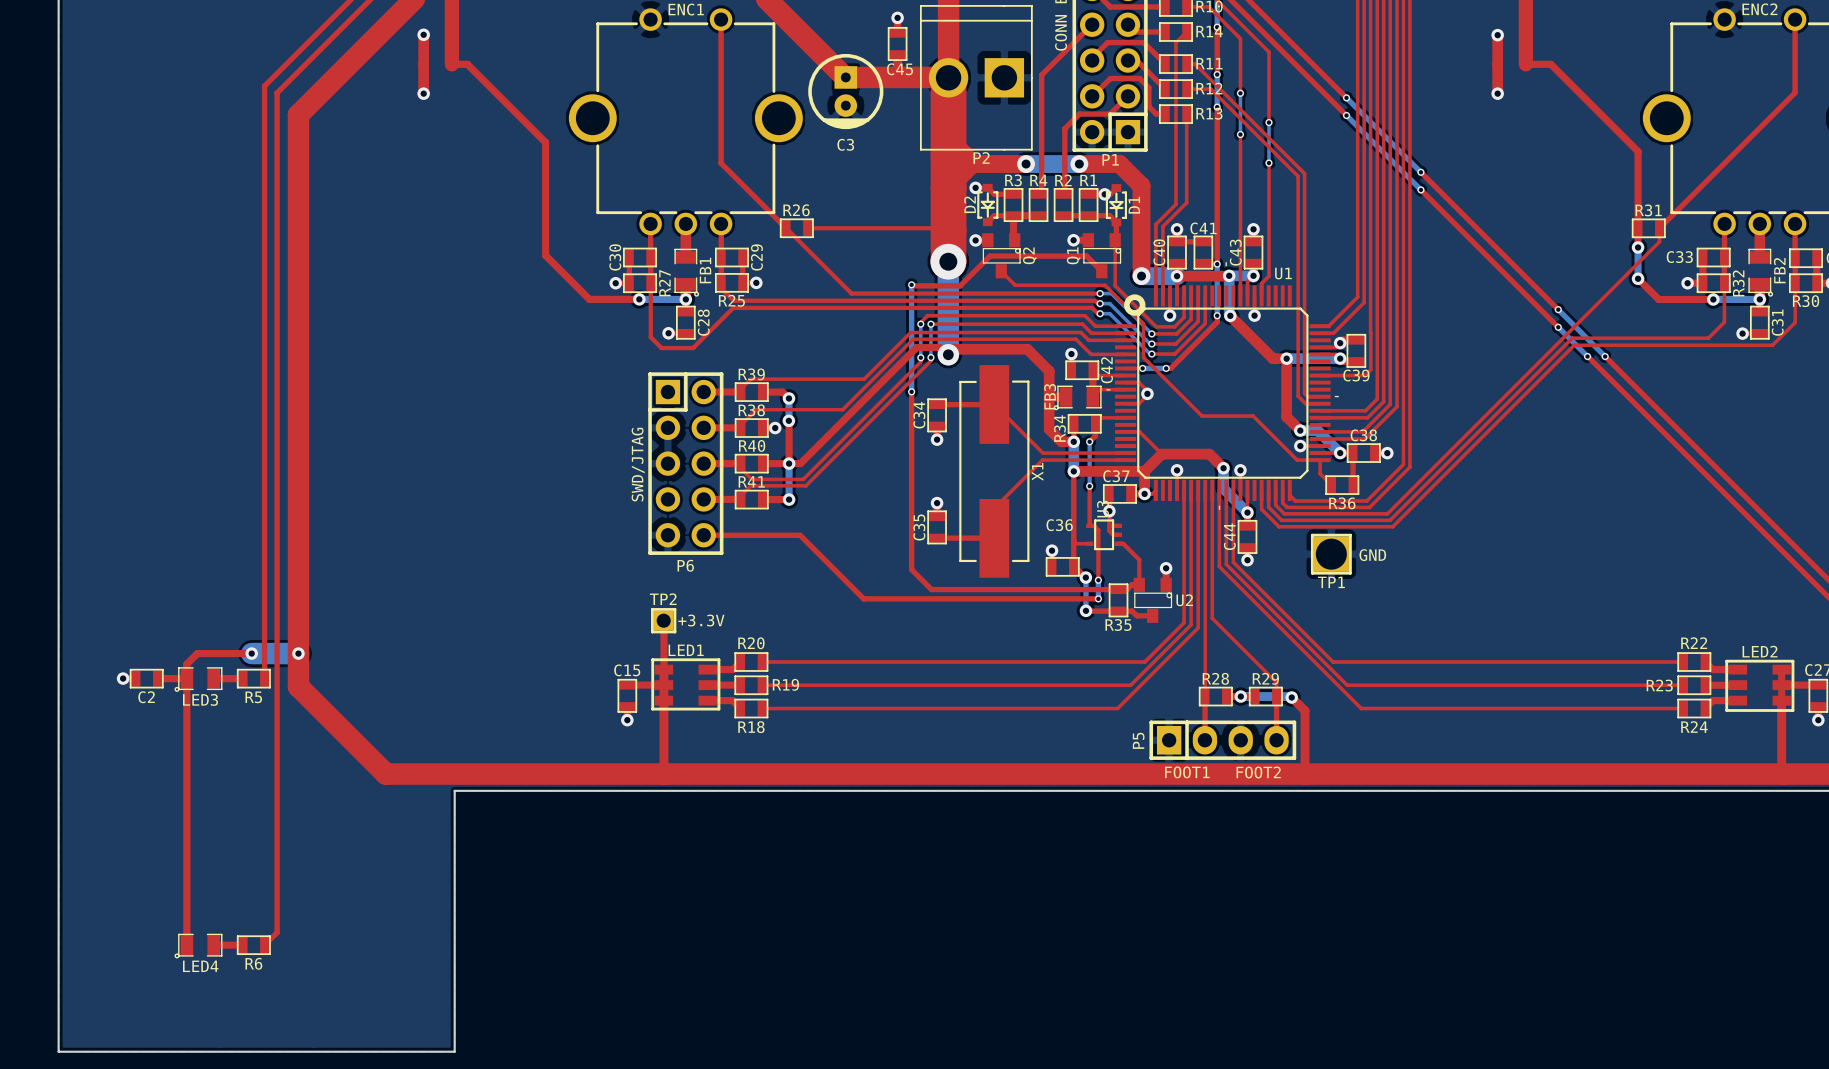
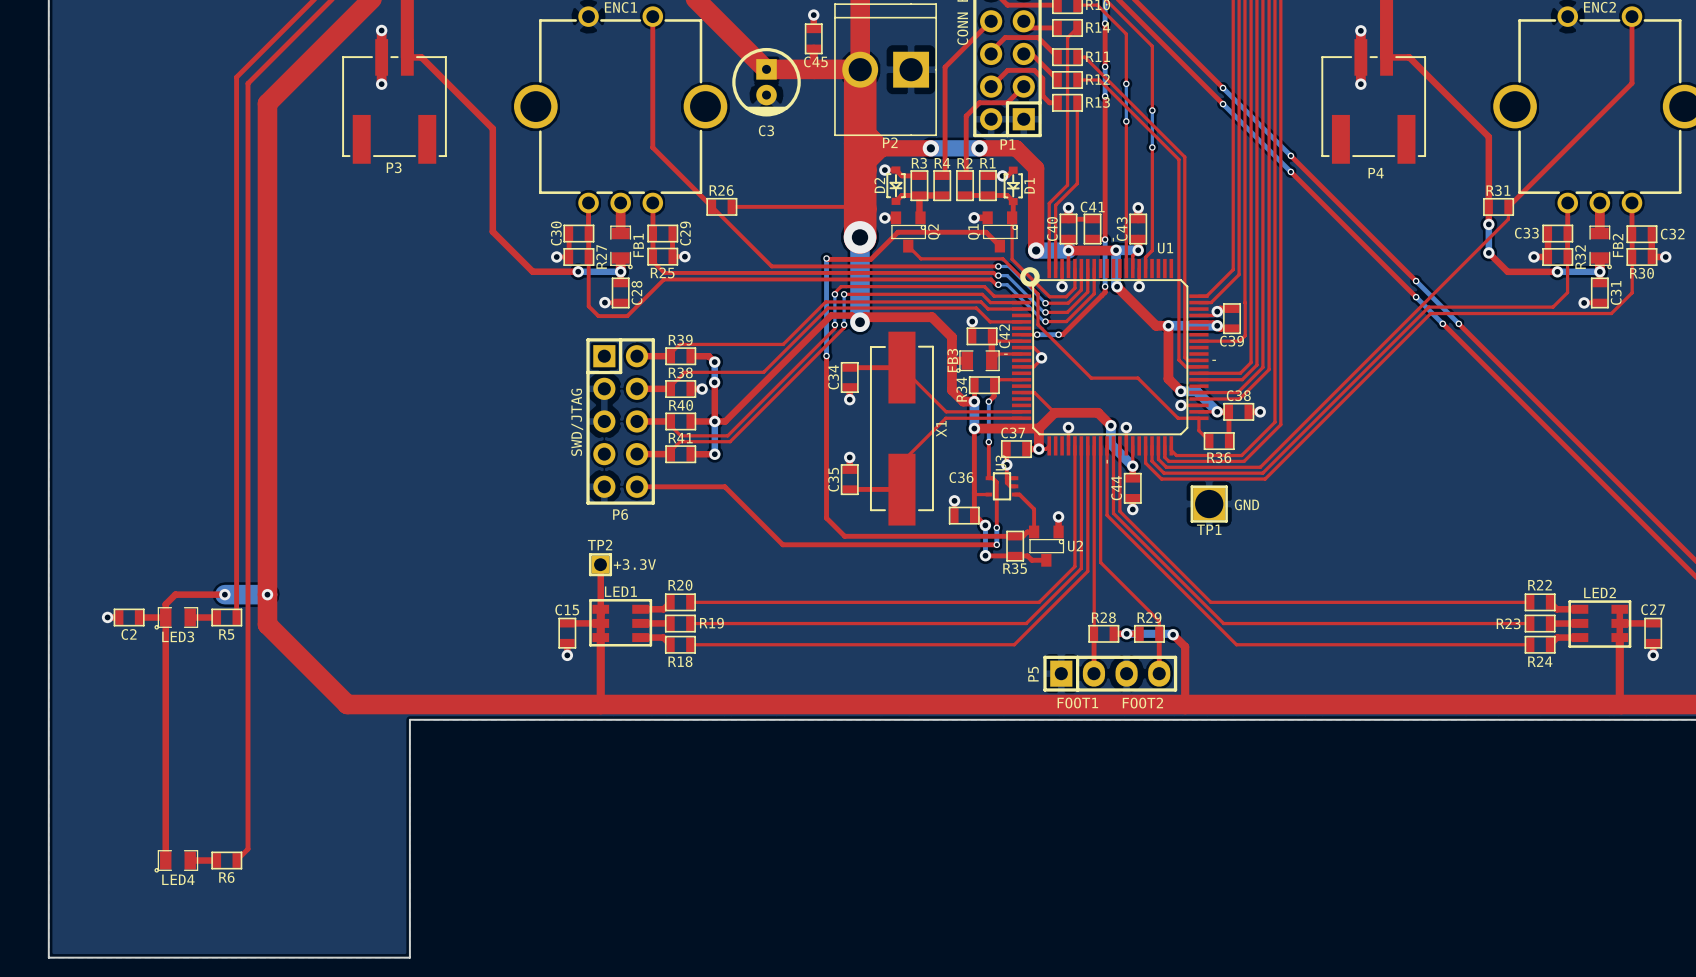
P3: none -> (394, 101)
P4: none -> (1373, 101)

